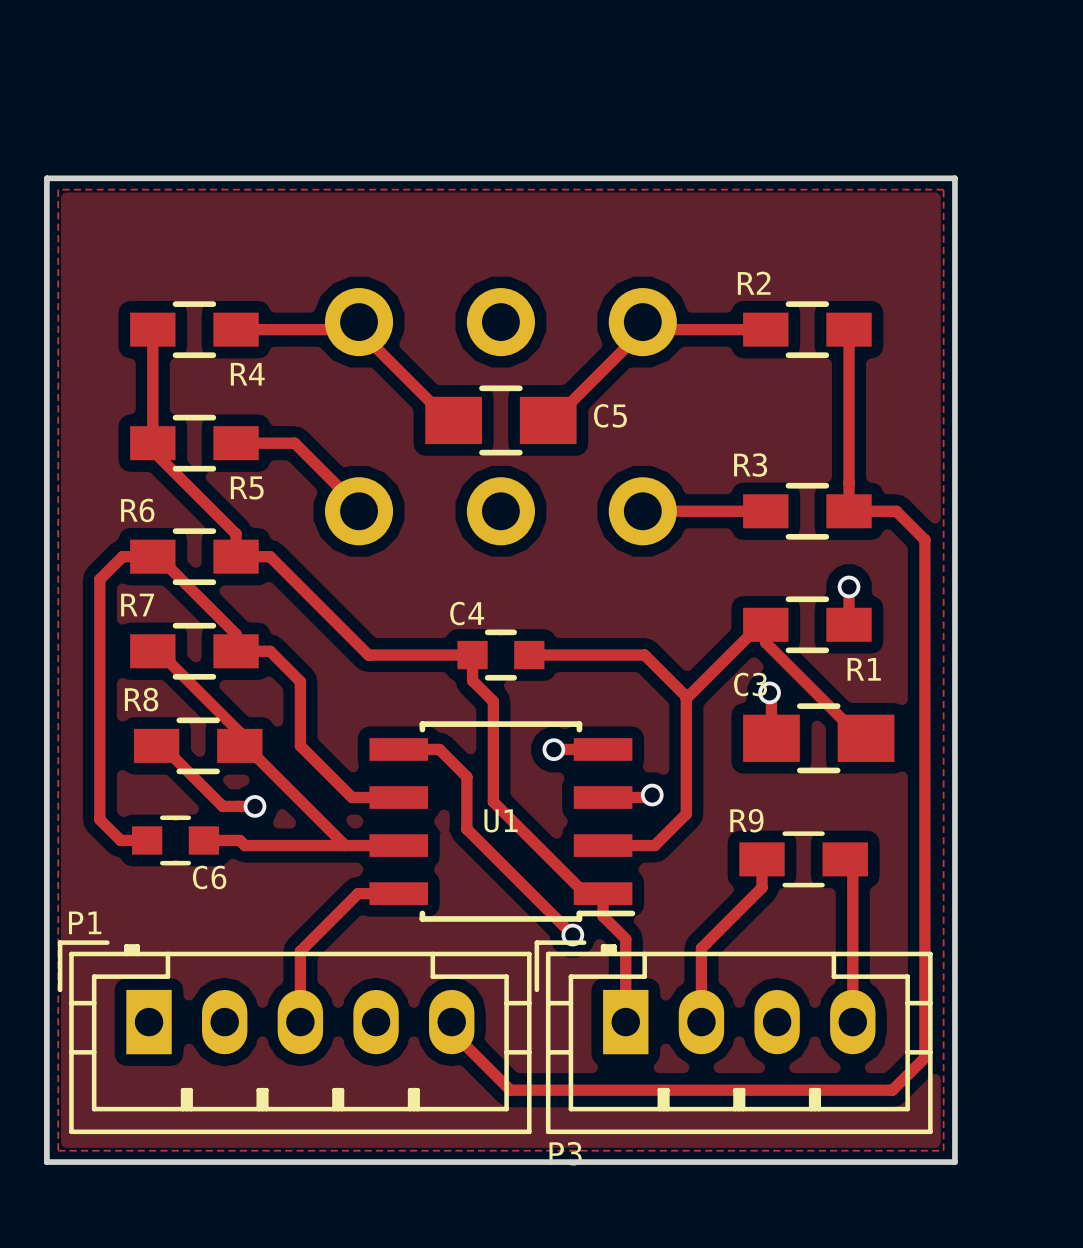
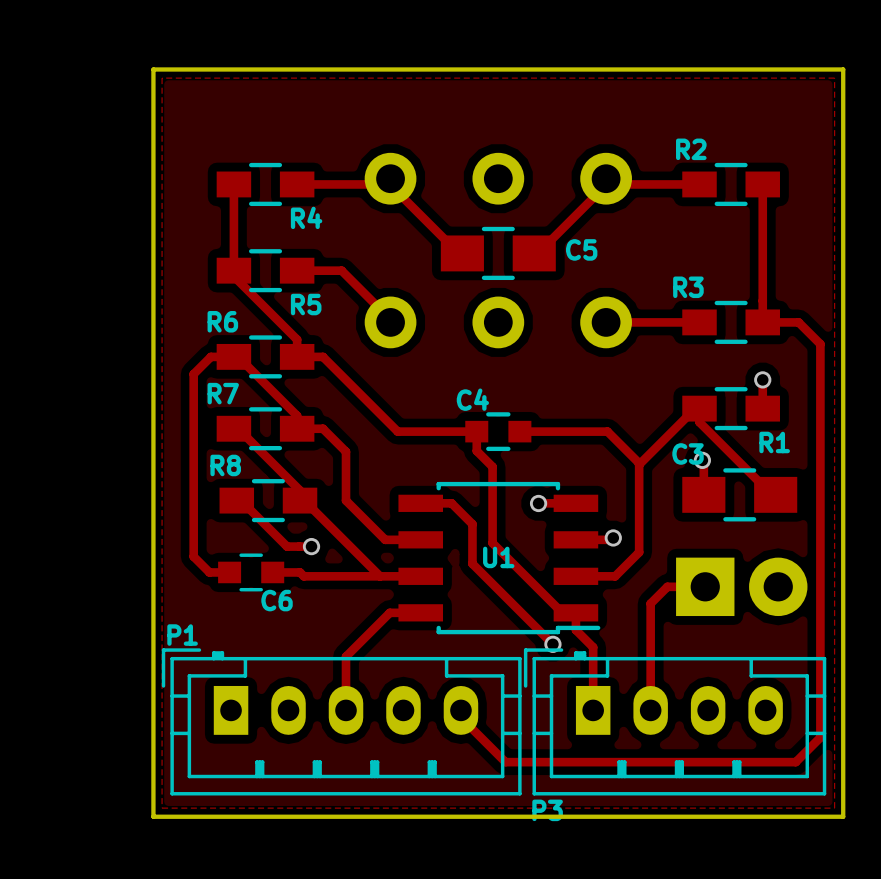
track: (761, 859) (761, 887) (701, 948) -> (705, 586) (667, 586) (650, 603) (650, 654)
R9: (803, 859) -> none
part: none -> (741, 586)
track: (845, 859) (852, 866) (852, 1022) -> none

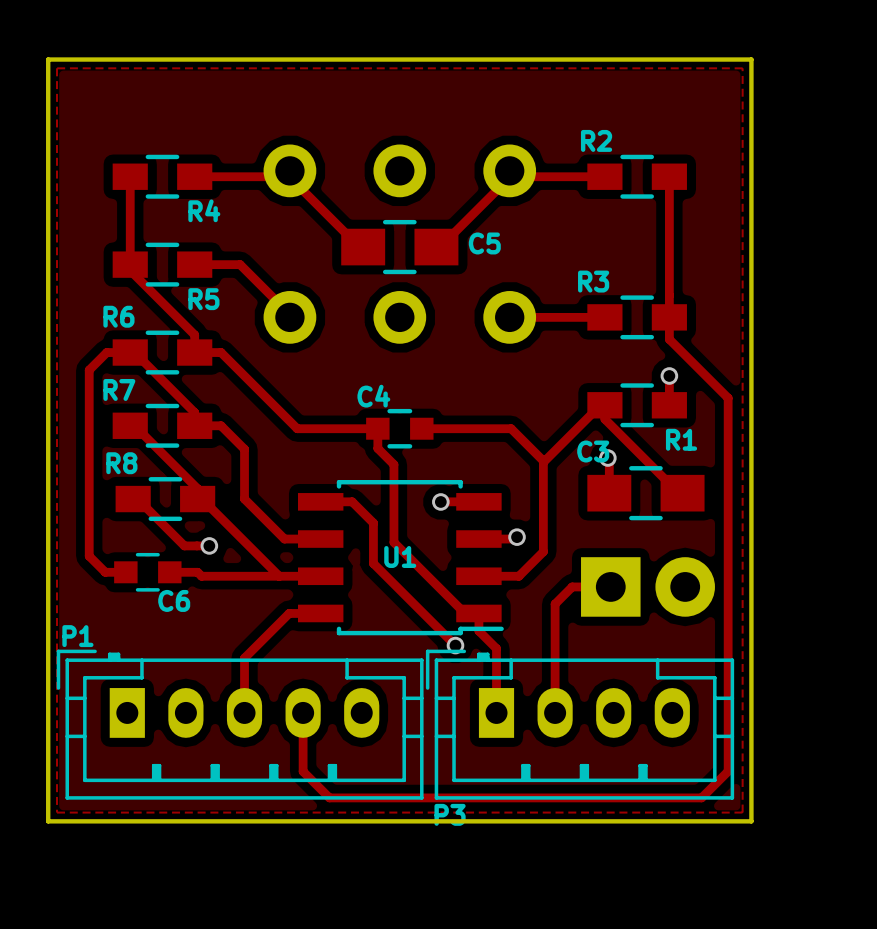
track: (762, 322) (798, 322) (820, 344) (820, 401) -> (669, 317) (669, 339) (728, 398)
track: (460, 710) (460, 717) (505, 762) (795, 762) (820, 737) -> (303, 712) (303, 771) (329, 797) (701, 797) (728, 771) (728, 740)

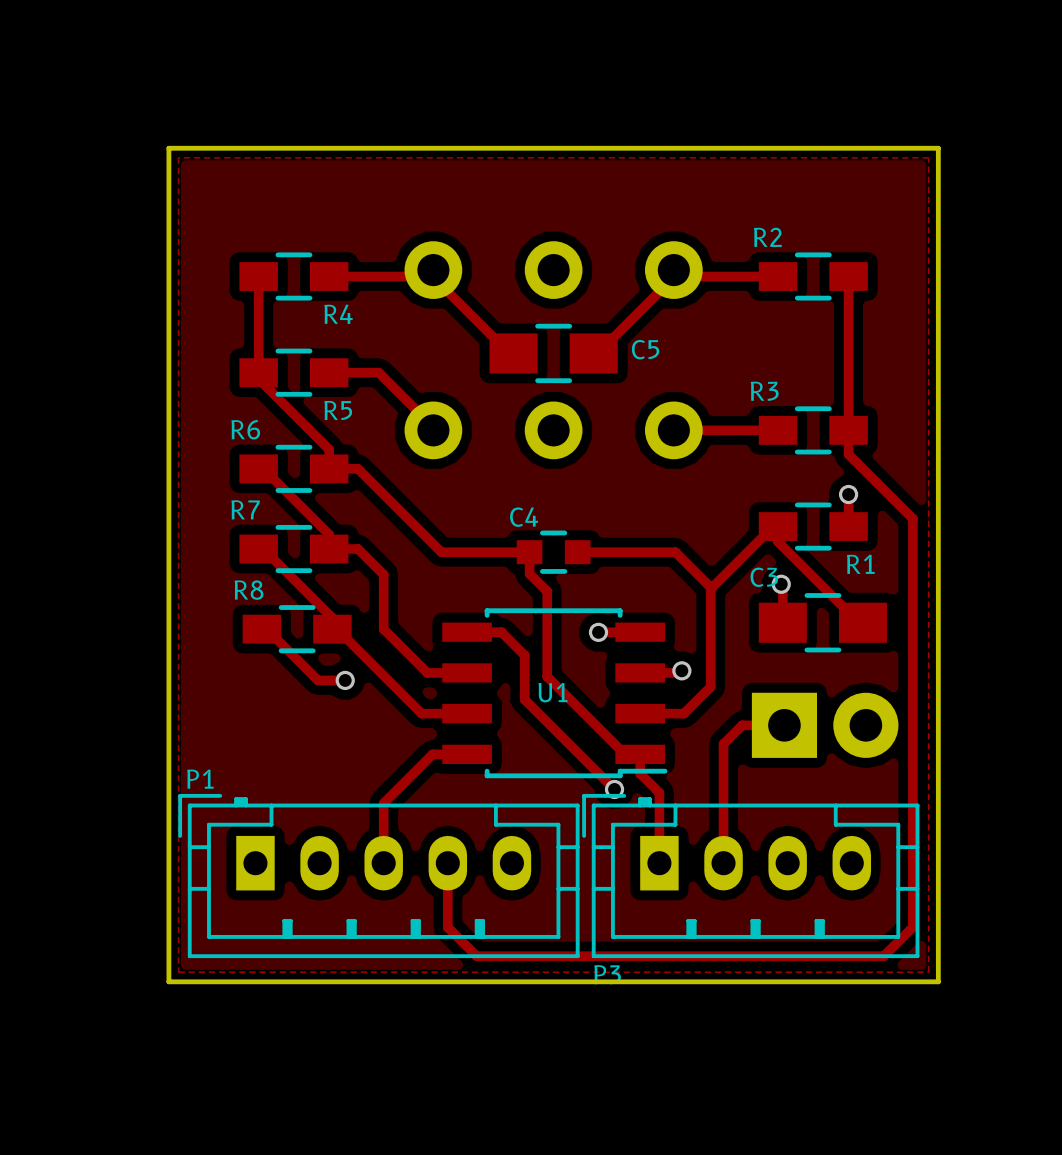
track: (130, 352) (106, 352) (89, 370) (89, 556) (105, 572) (125, 572) -> none
C6: (147, 572) -> none
track: (169, 572) (197, 572) (201, 576) (279, 576) -> none

